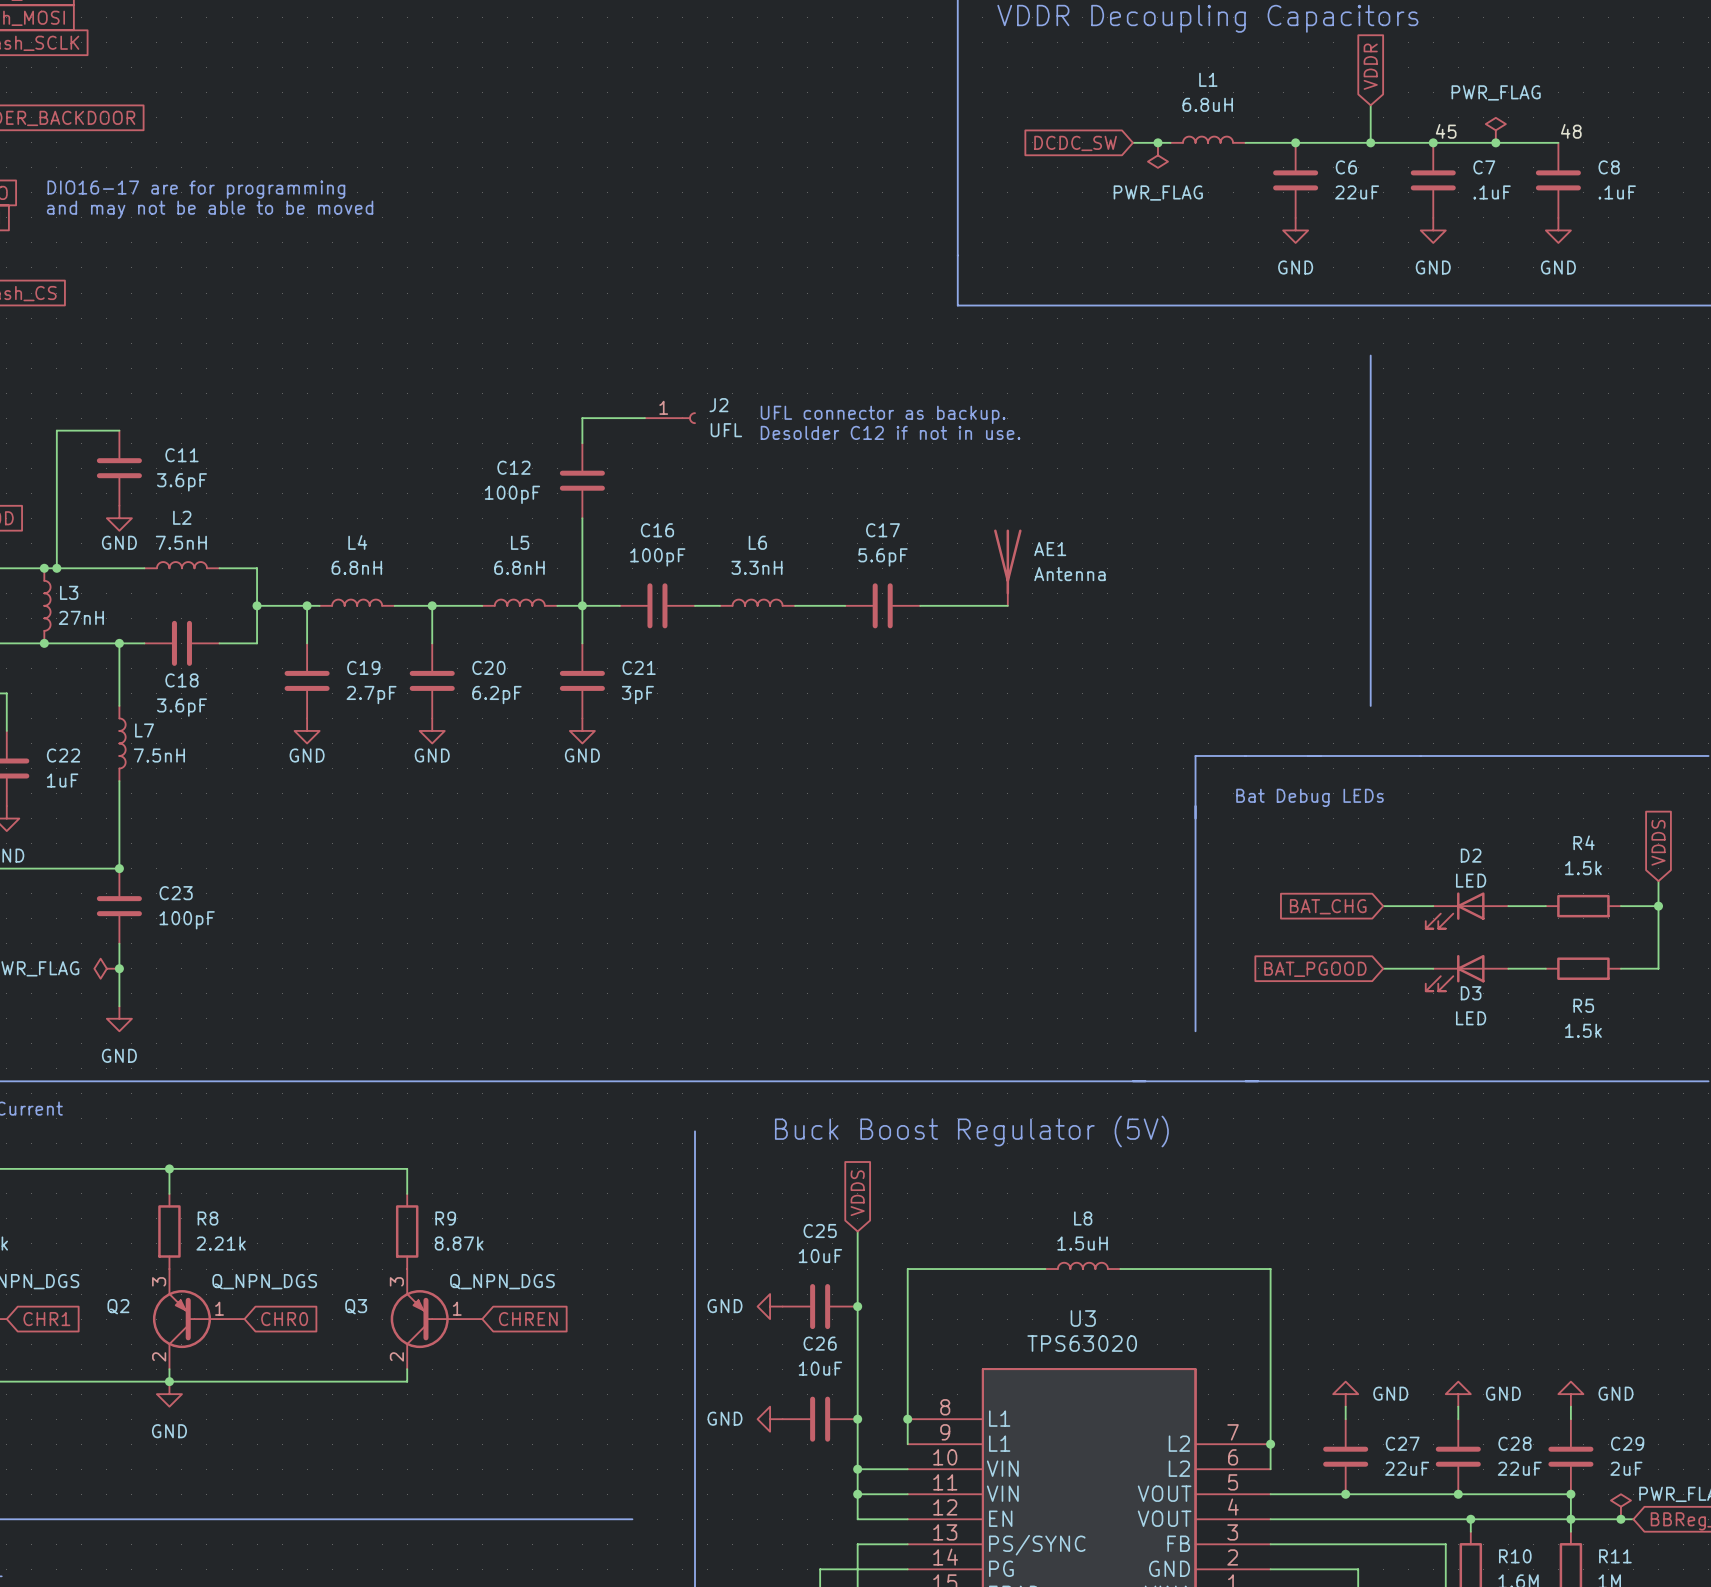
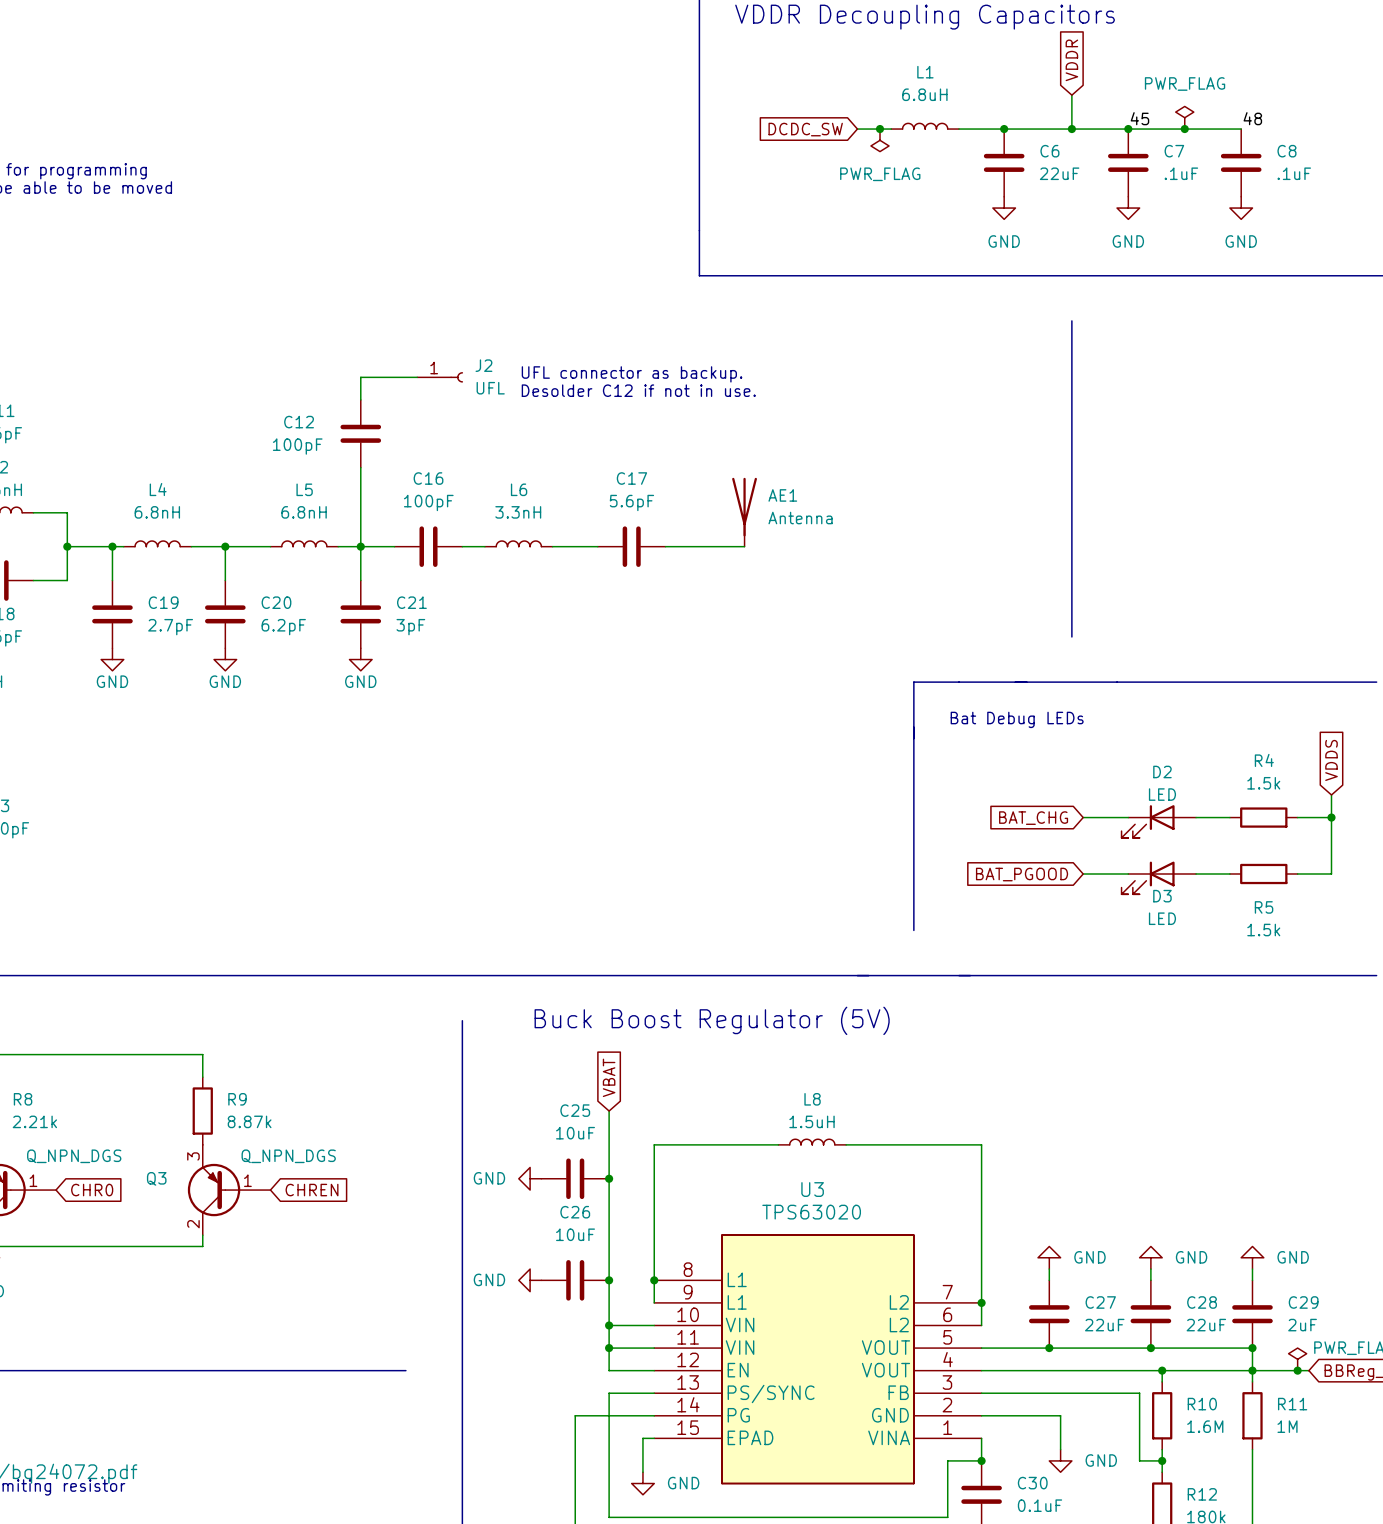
global label: VDDS (857, 1193) -> VBAT (609, 1077)

